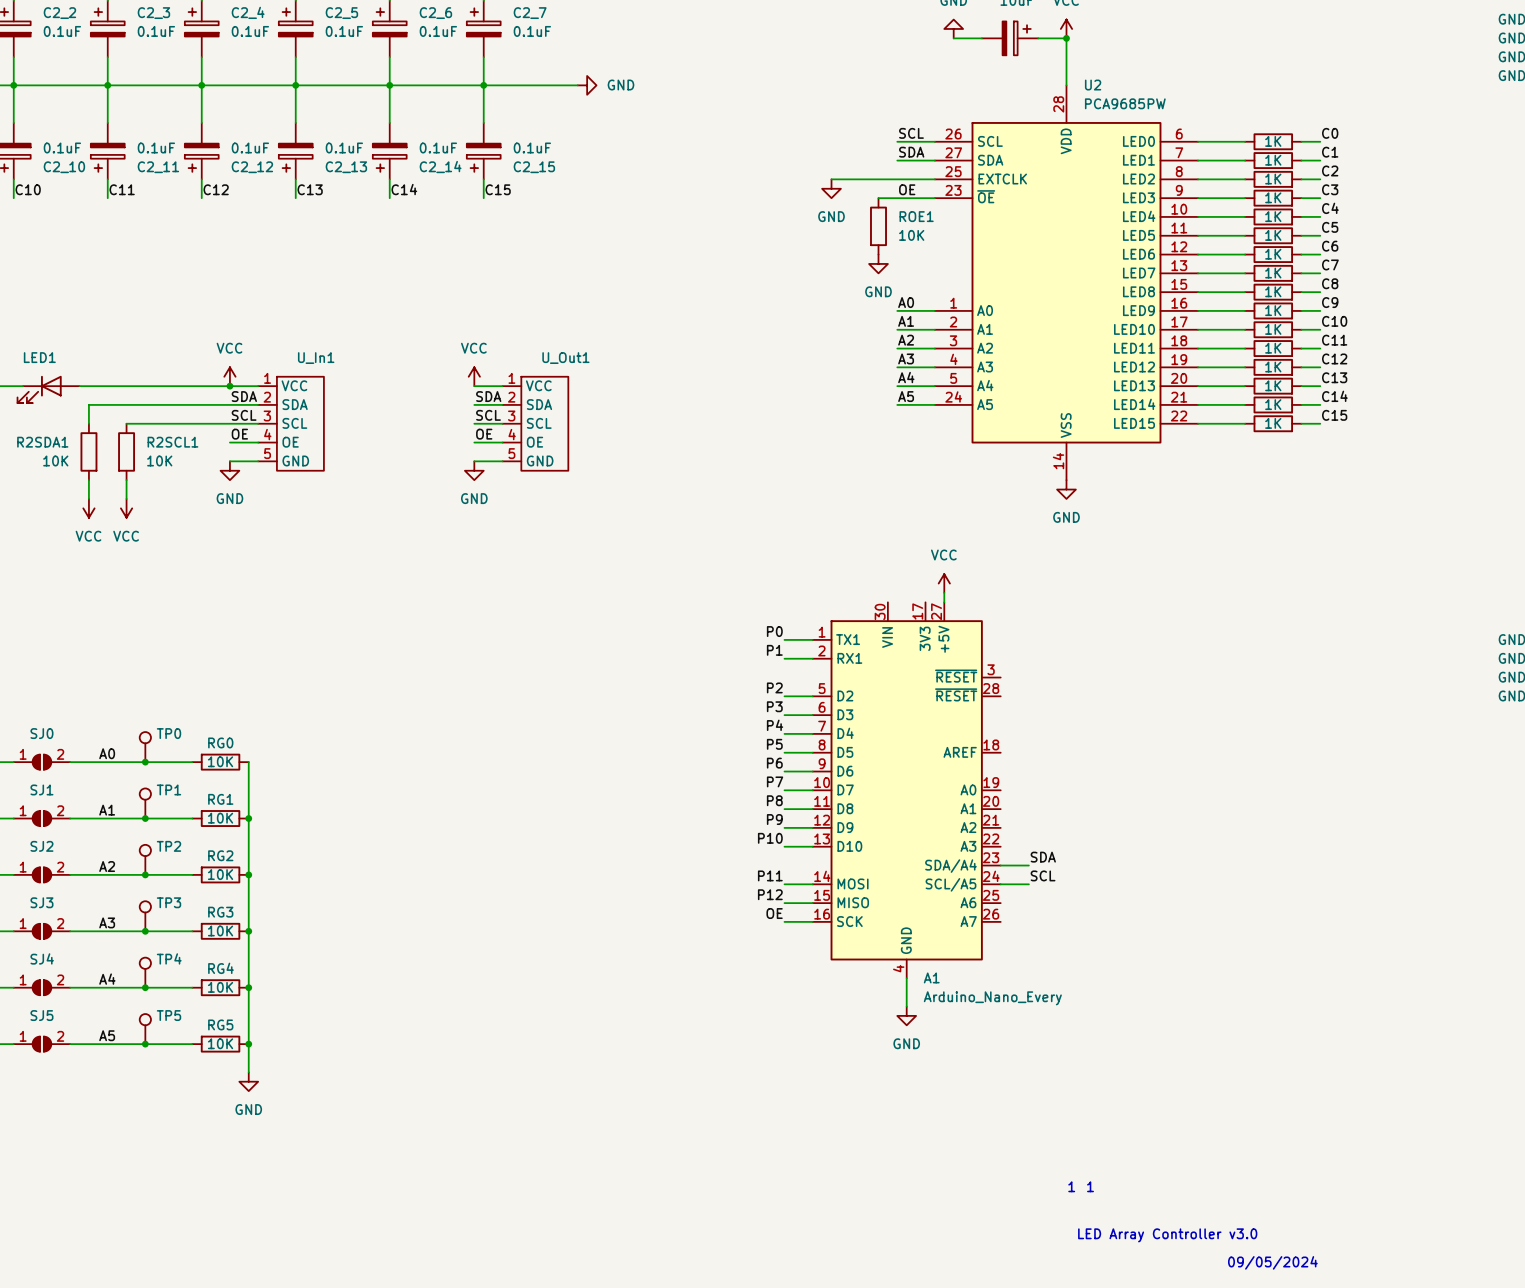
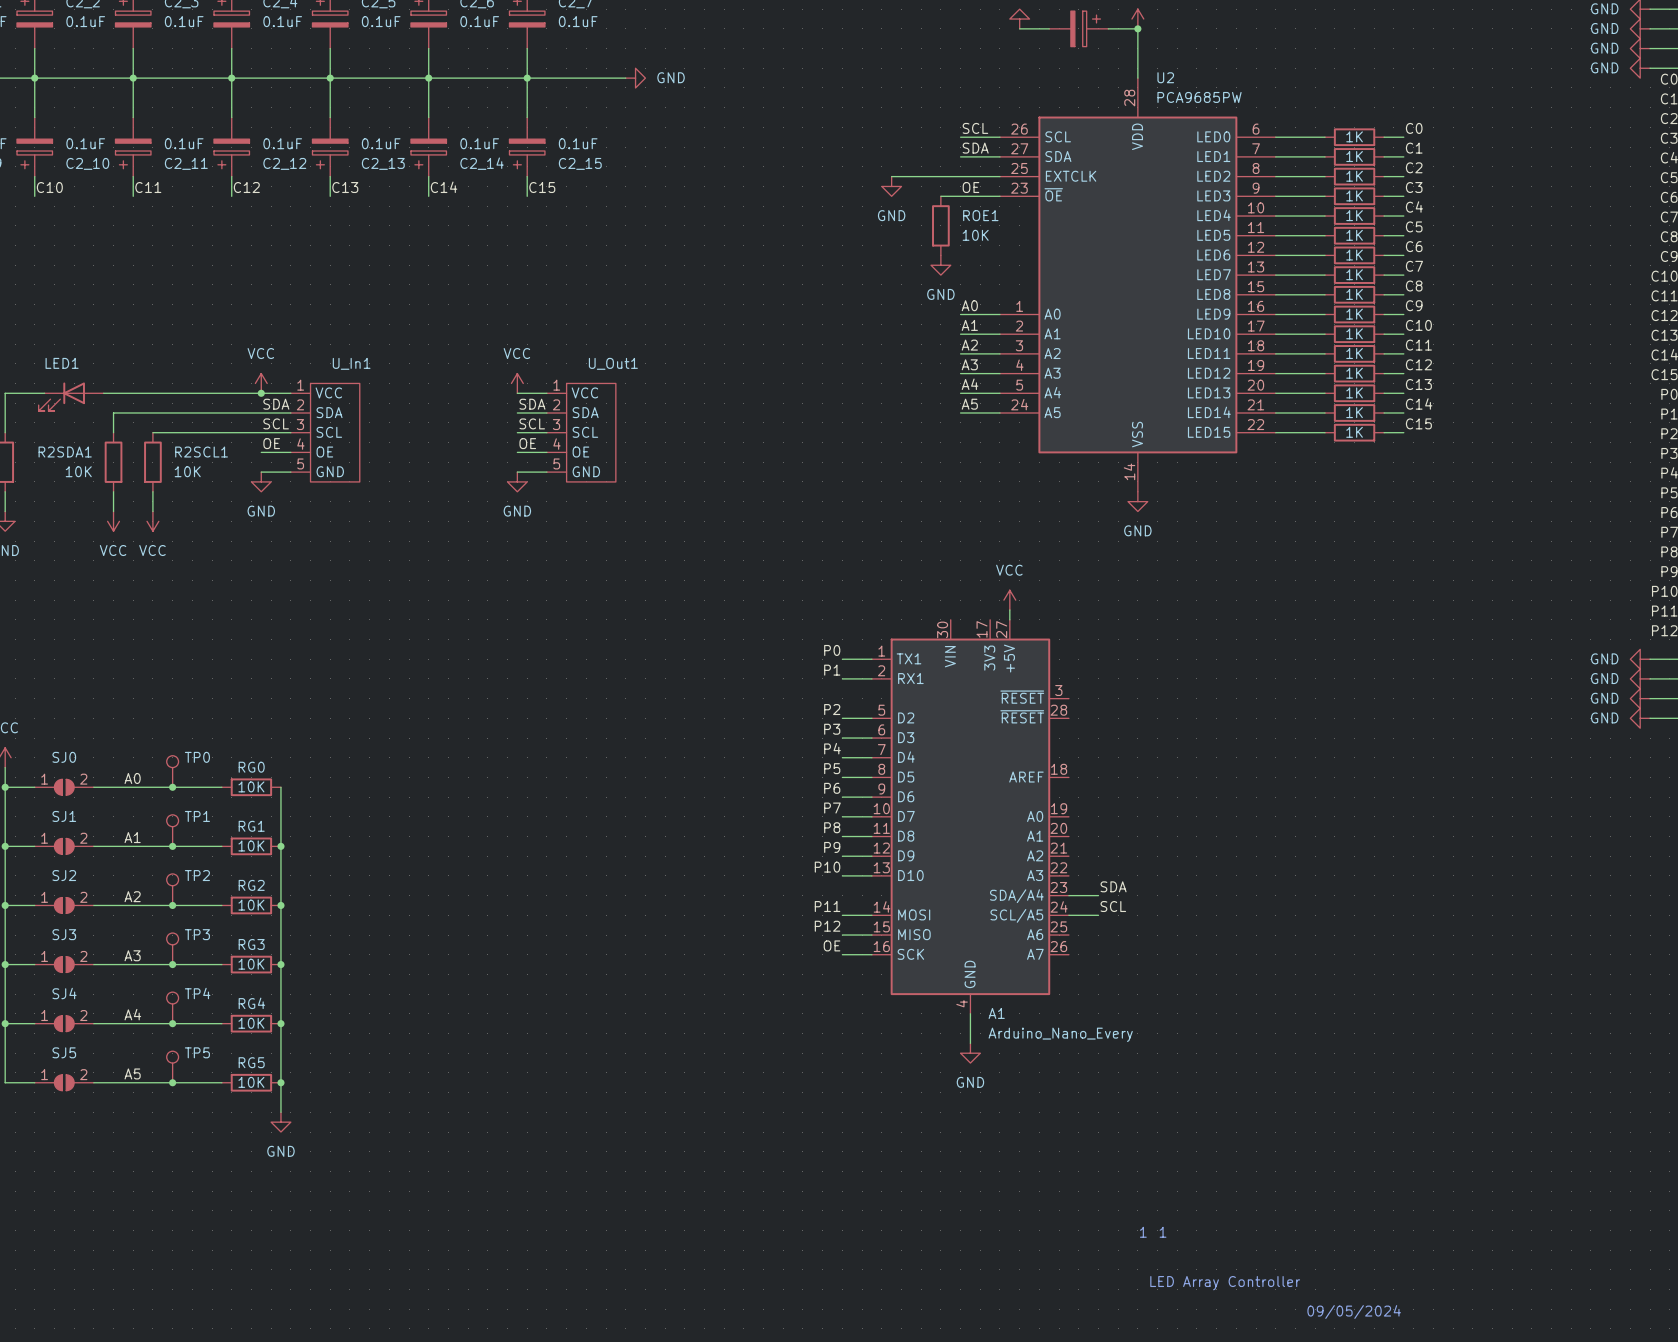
text: LED Array Controller v3.0 (1167, 1235) -> LED Array Controller (1225, 1283)

